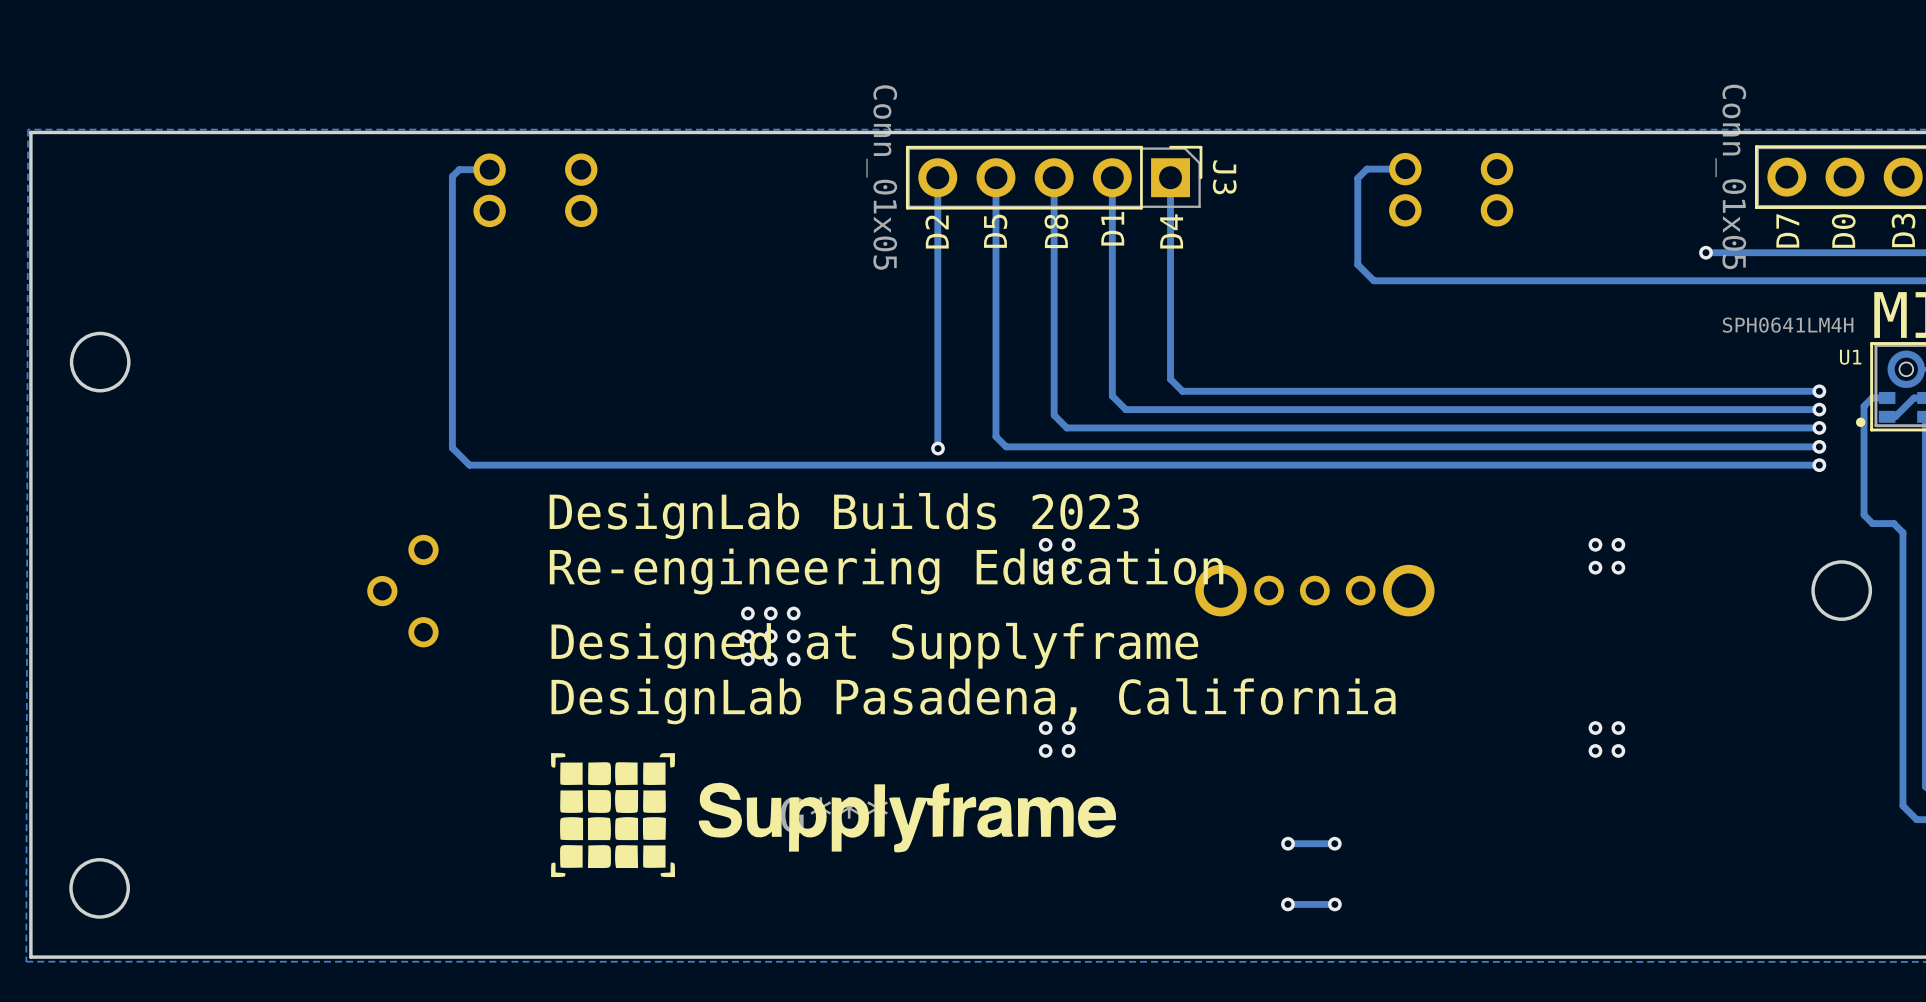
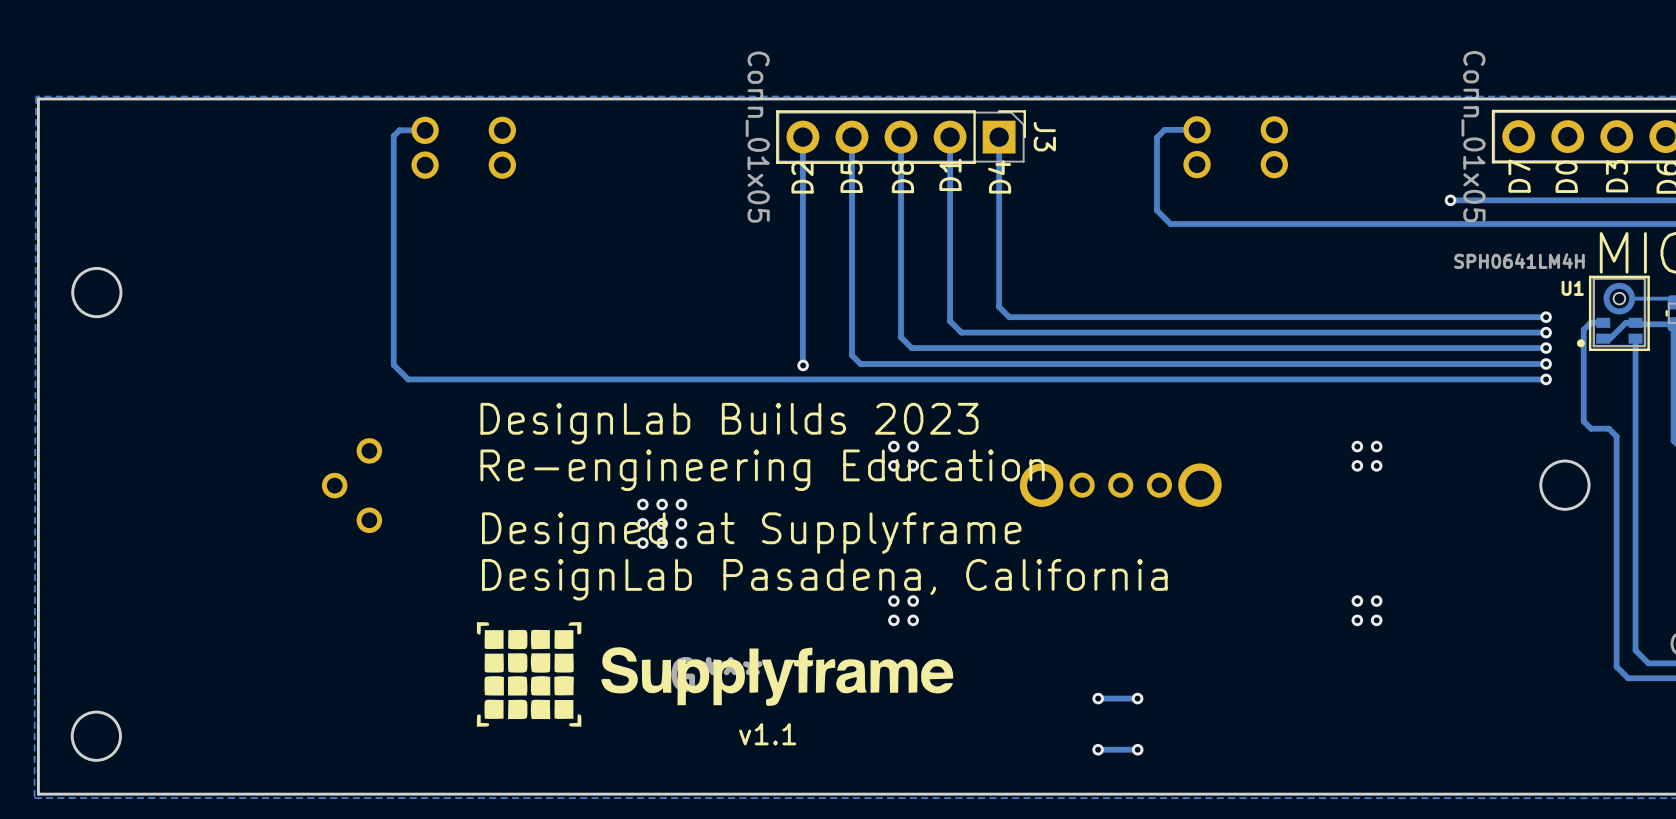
text: none -> v1.1 (767, 734)

